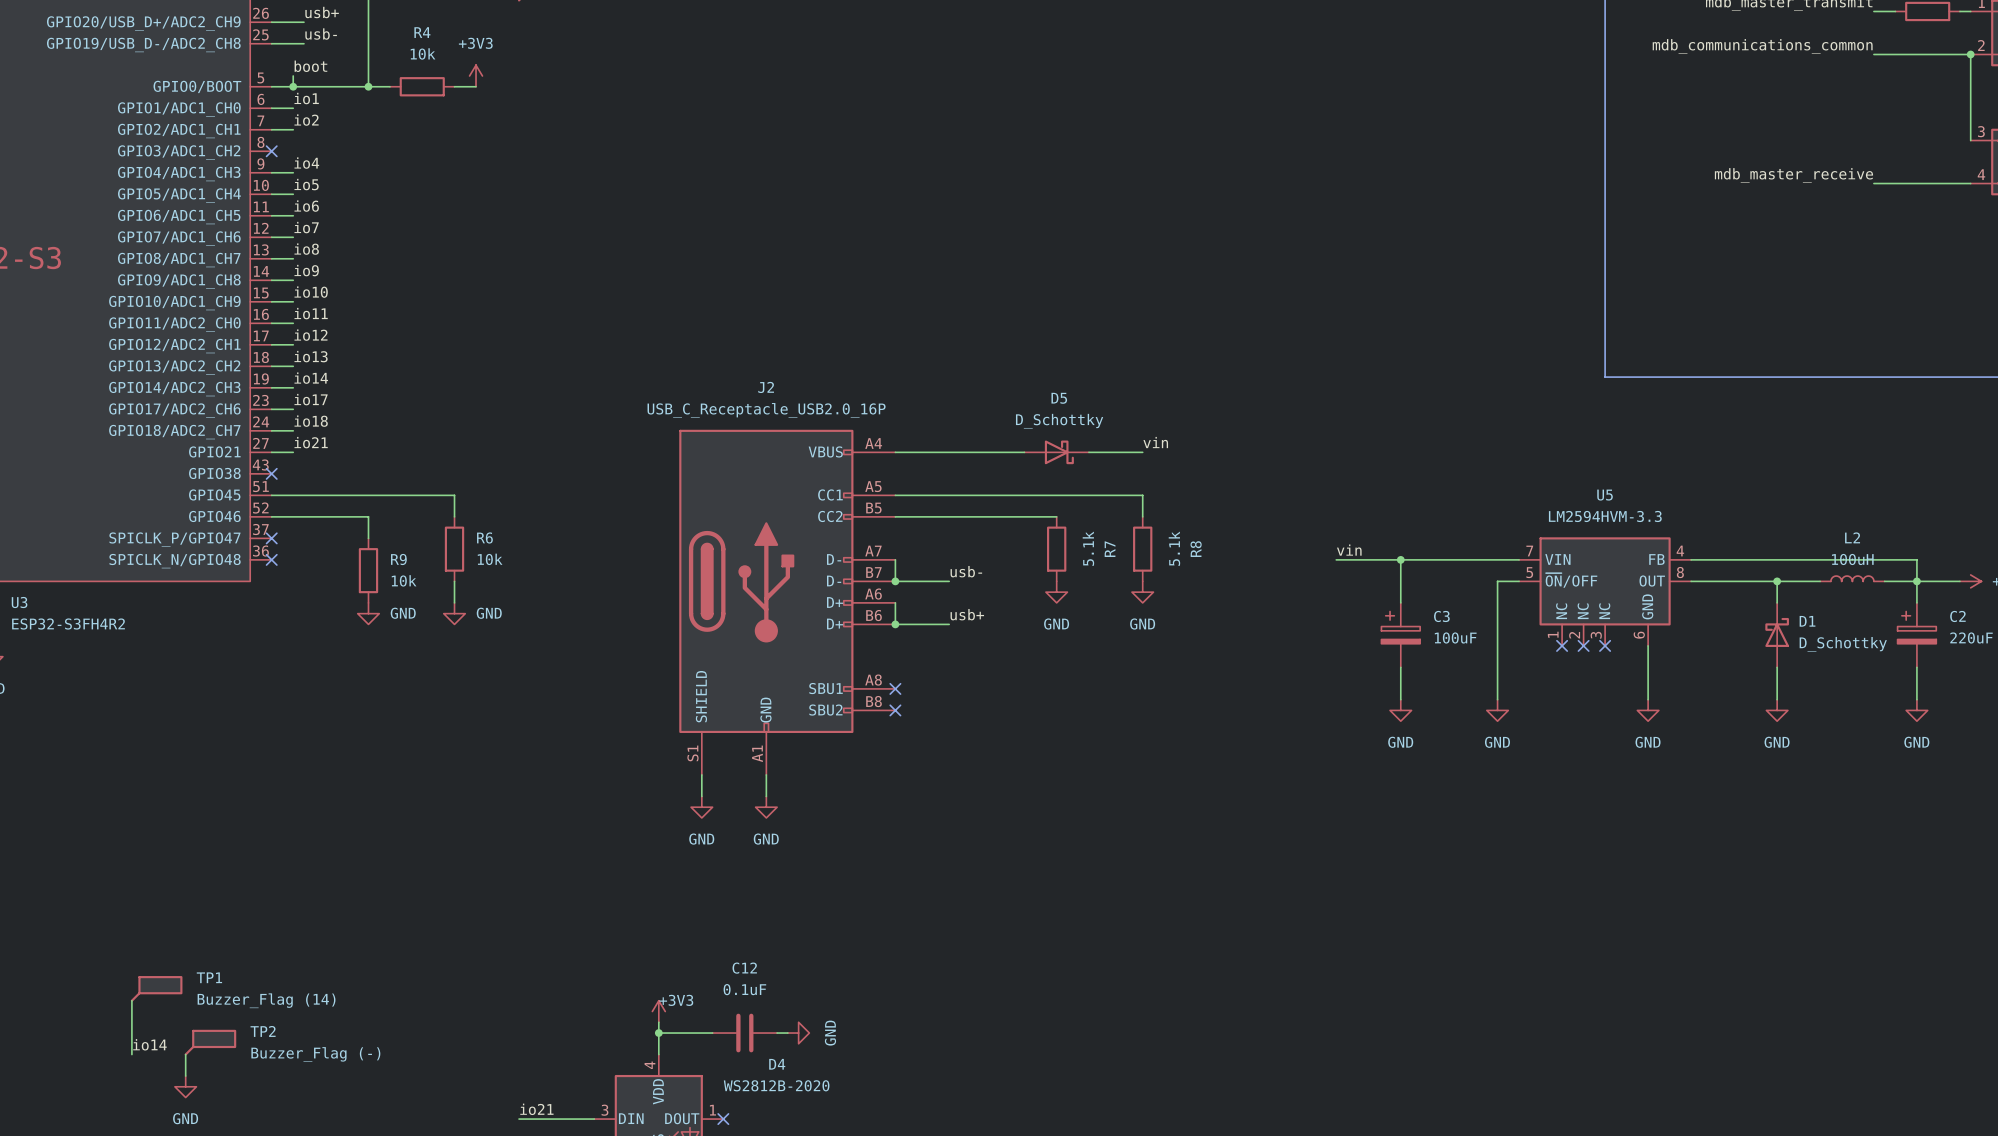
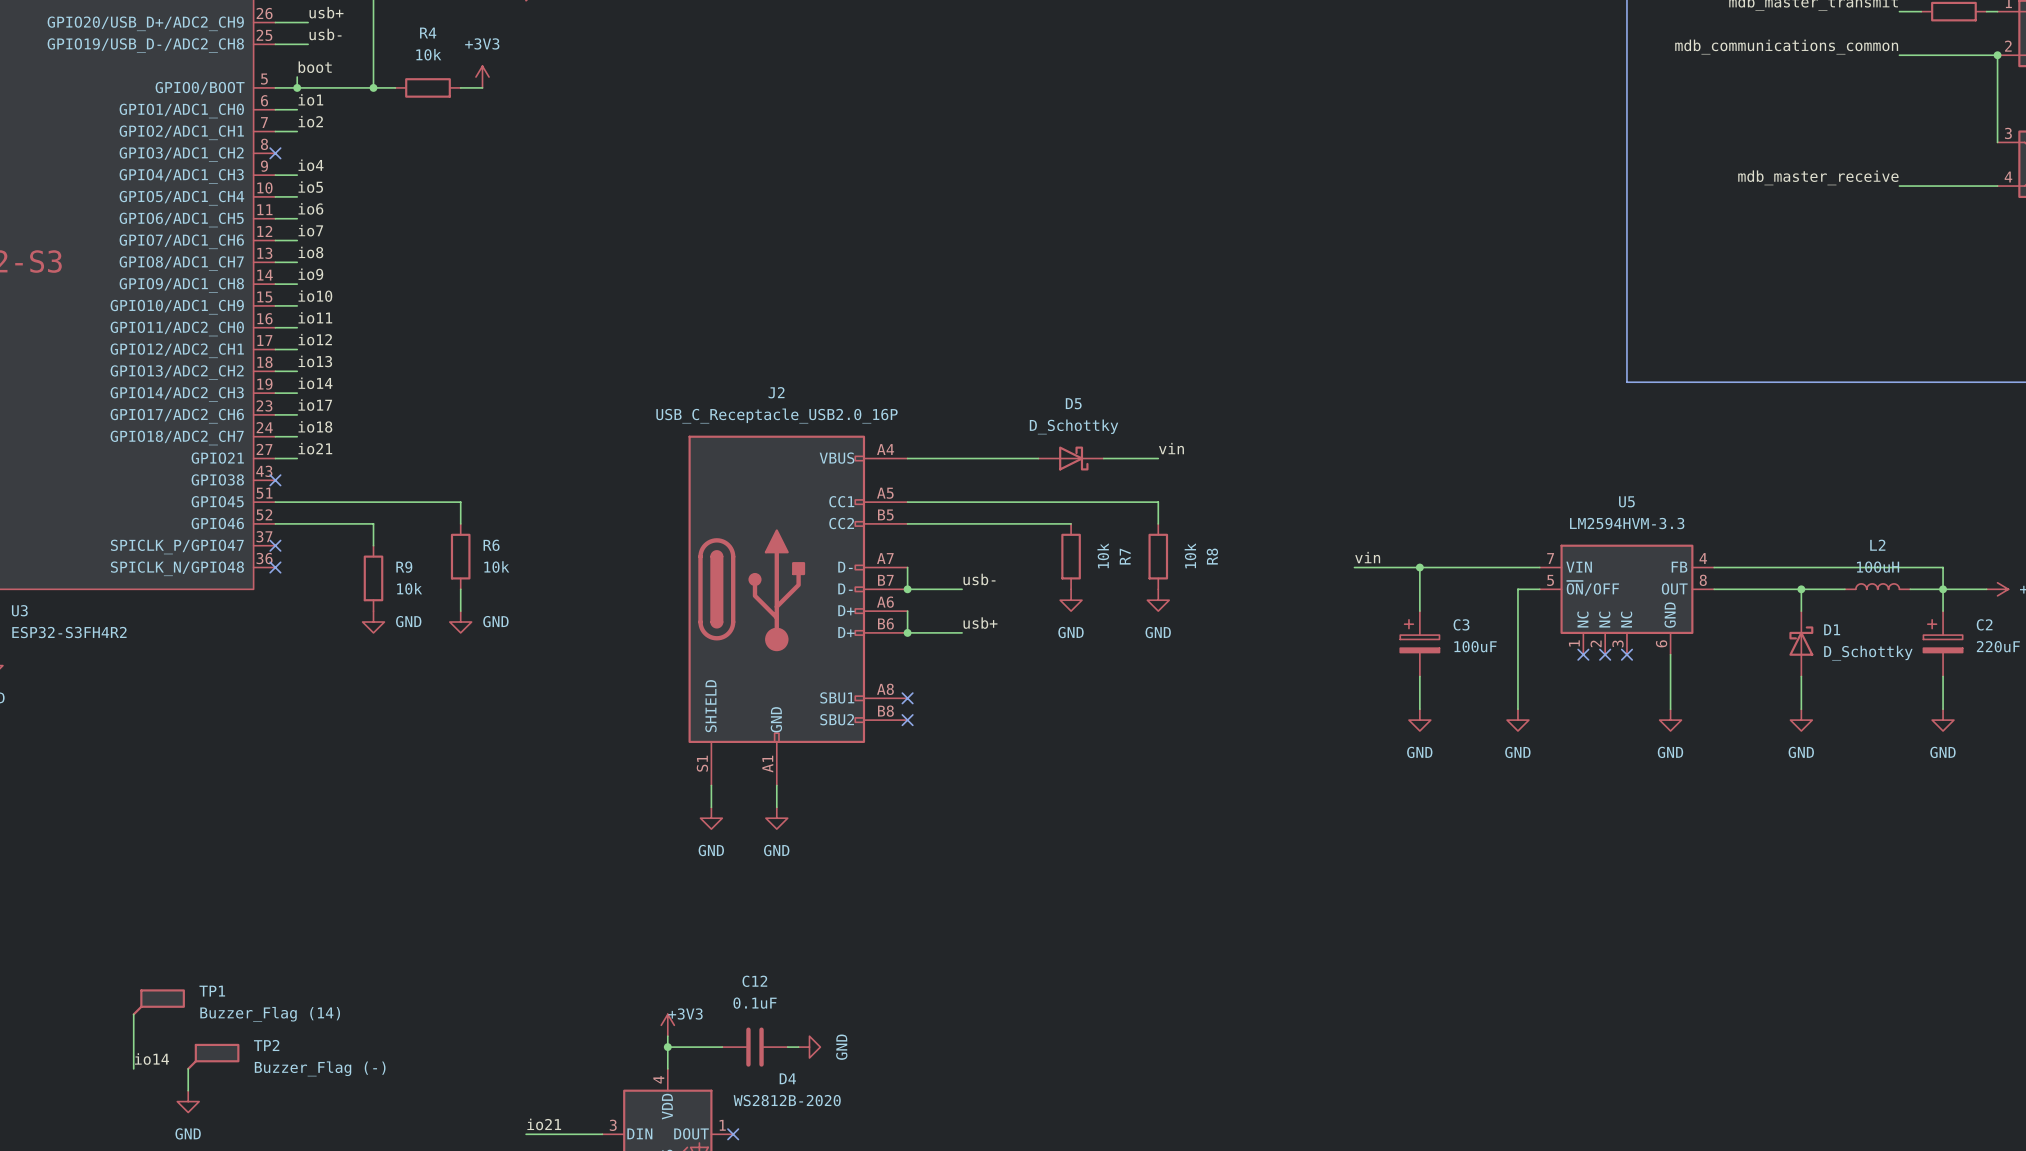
R7 value: 5.1k (1088, 548) -> 10k (1103, 555)
R8 value: 5.1k (1174, 548) -> 10k (1190, 555)

